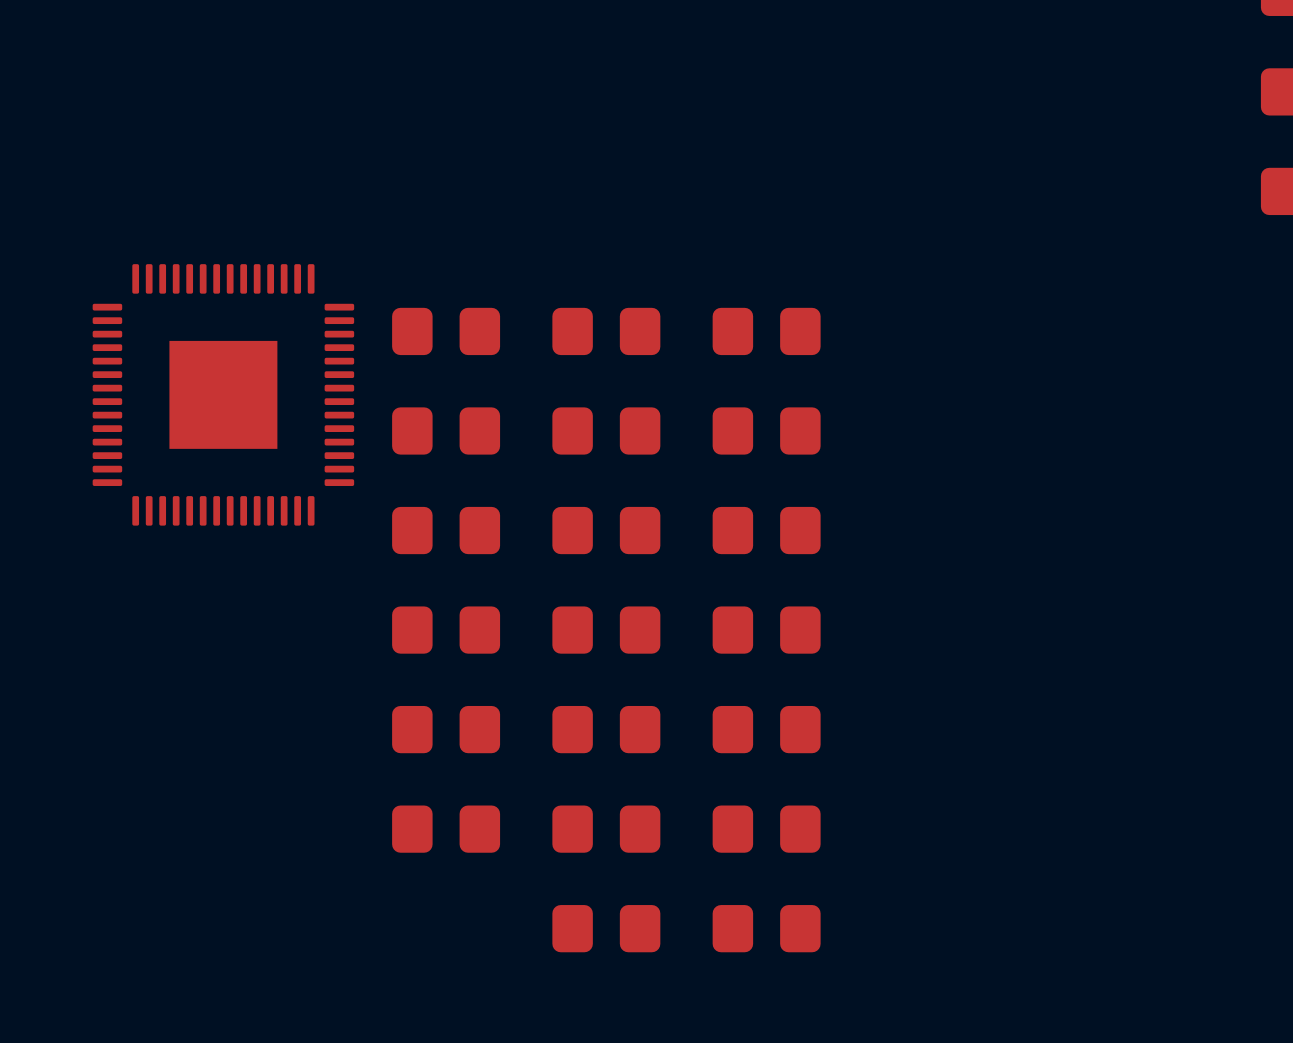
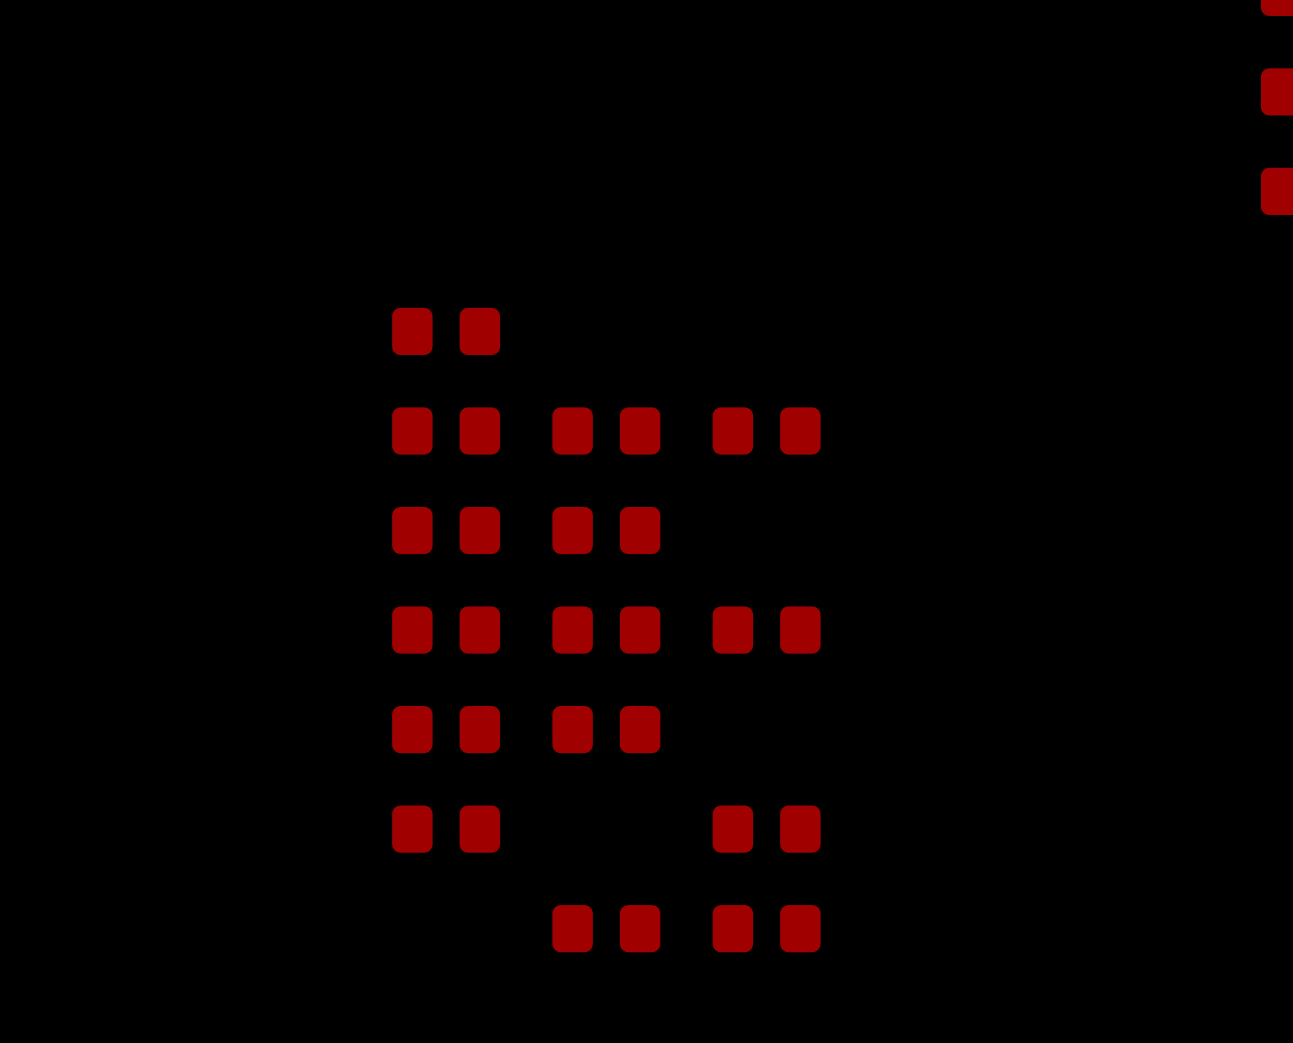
part: (606, 331) -> none
part: (766, 331) -> none
part: (223, 394) -> none
part: (766, 530) -> none
part: (766, 729) -> none
part: (606, 829) -> none

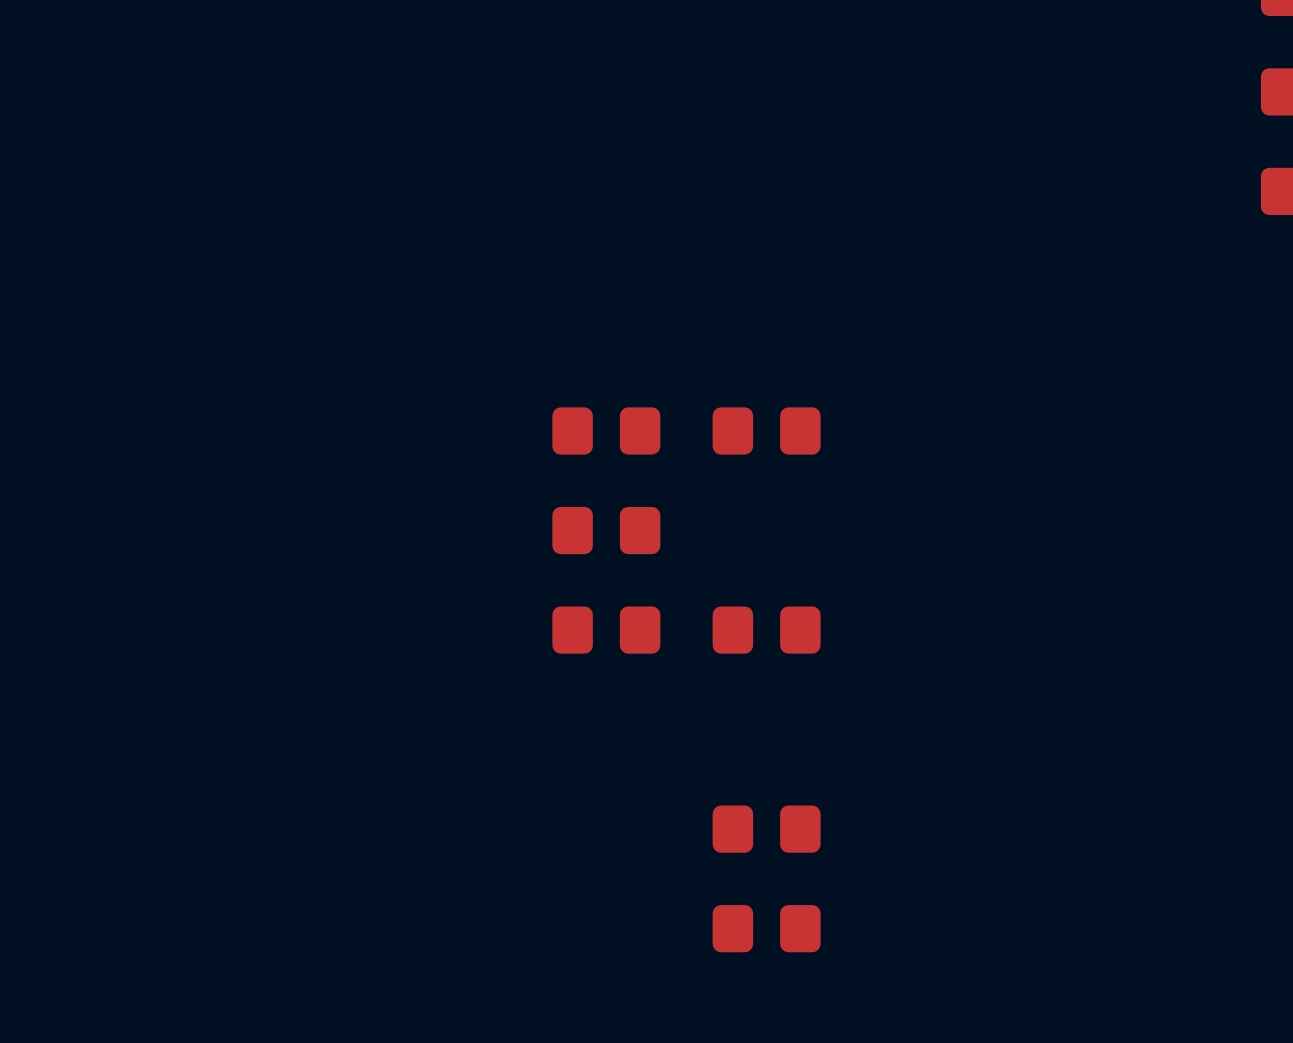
part: (446, 331) -> none
part: (446, 430) -> none
part: (446, 530) -> none
part: (446, 630) -> none
part: (446, 729) -> none
part: (606, 729) -> none
part: (446, 829) -> none
part: (606, 928) -> none

